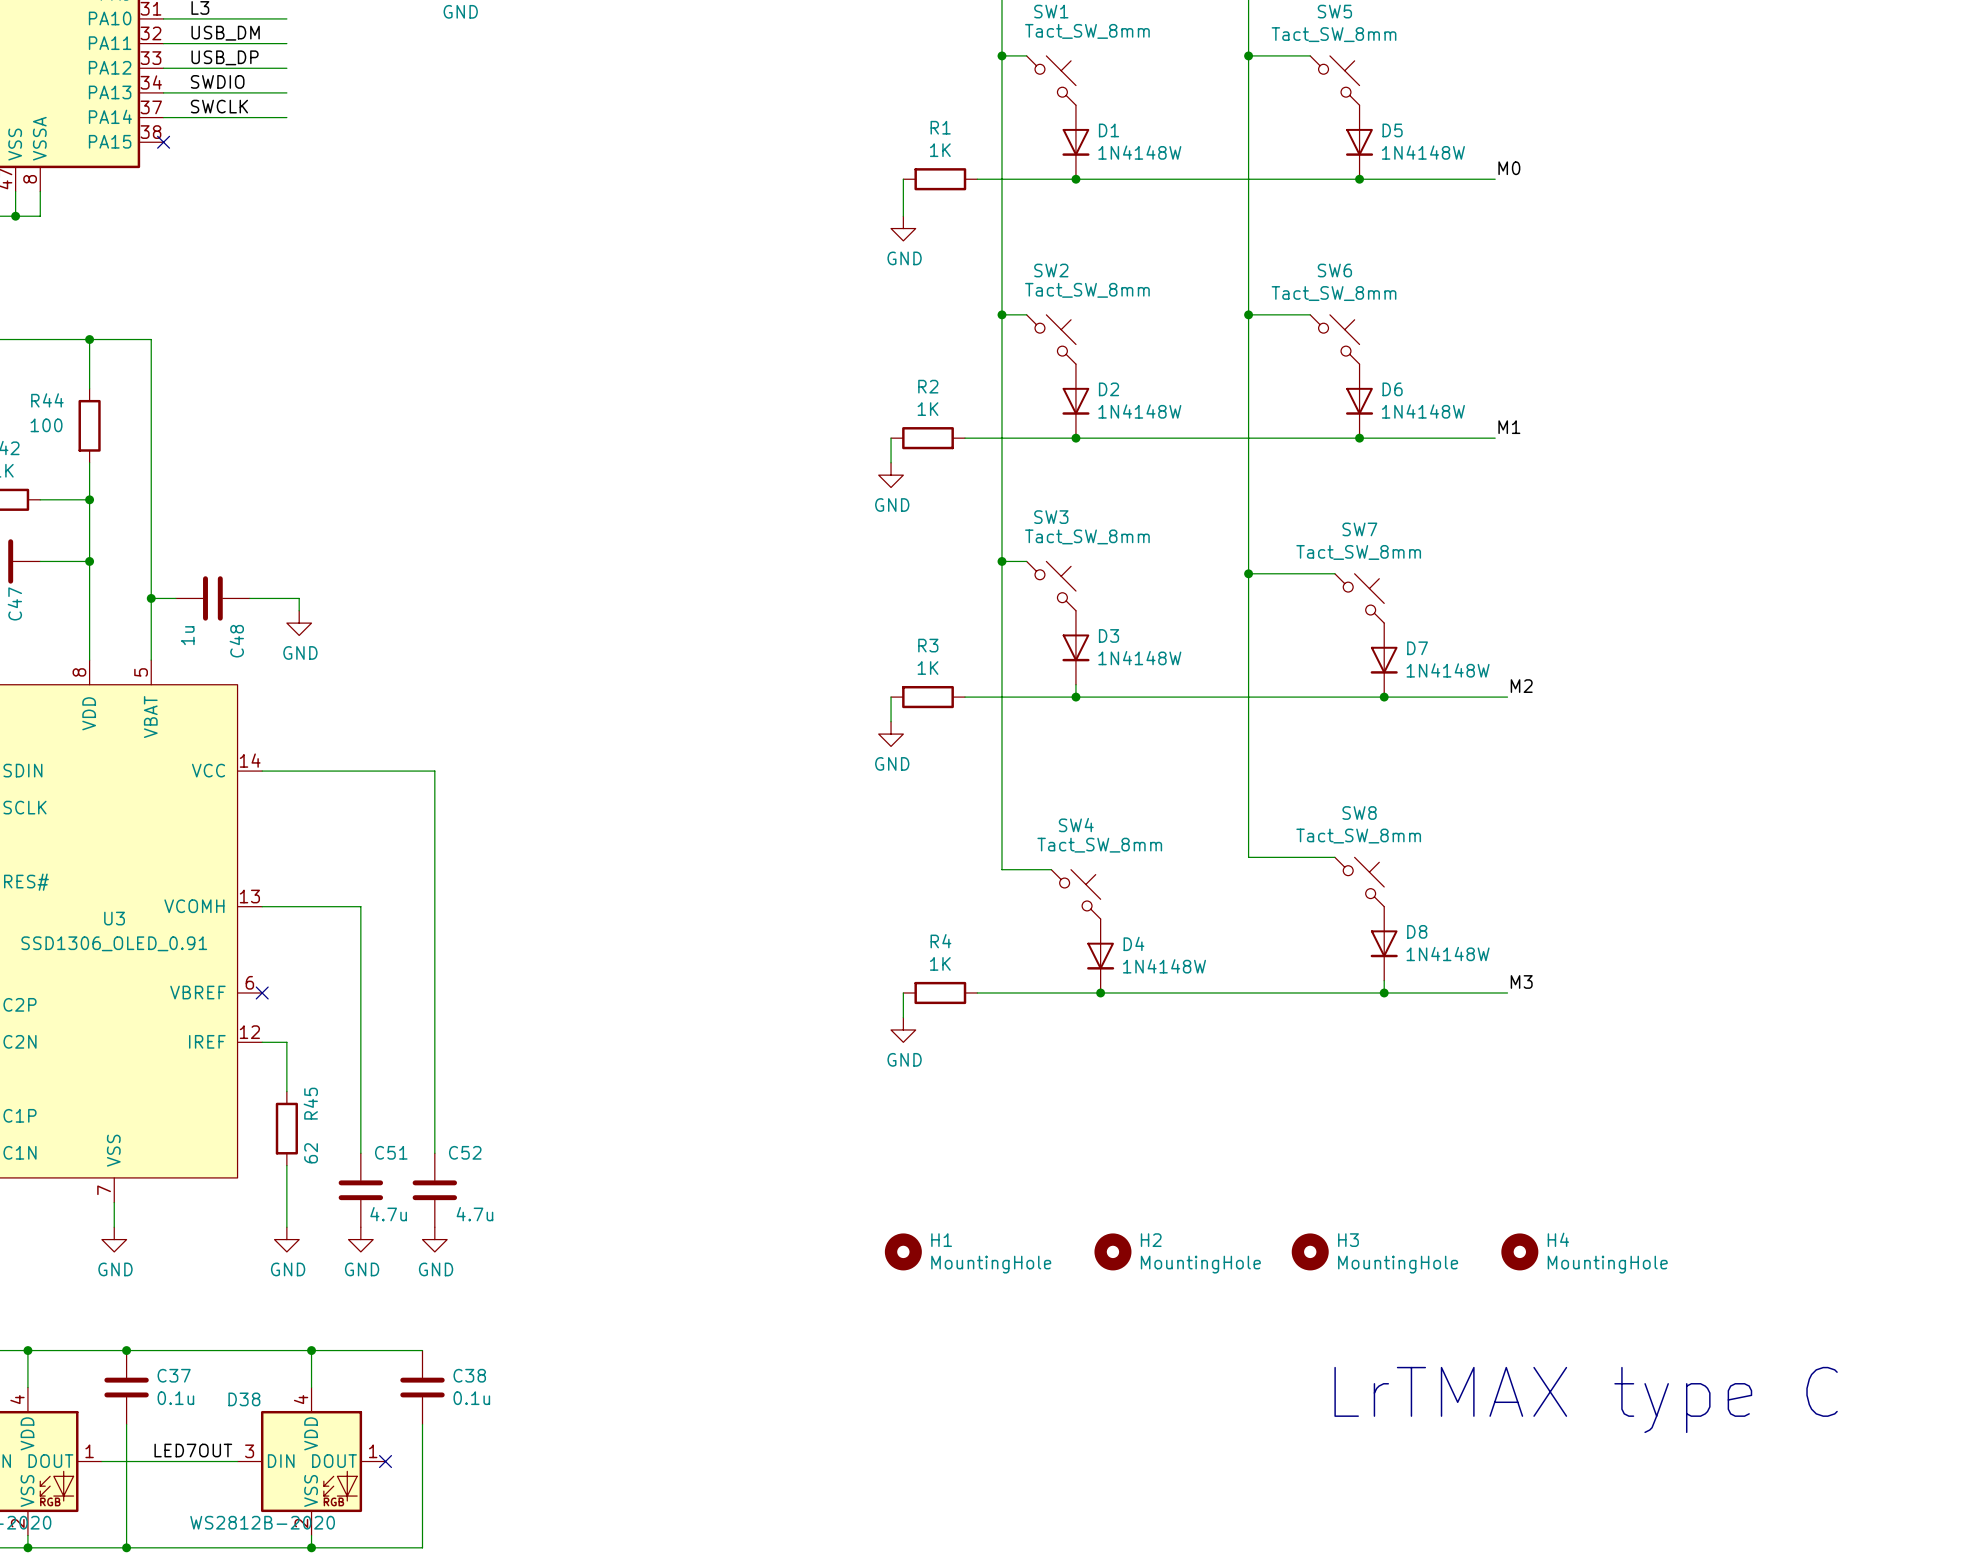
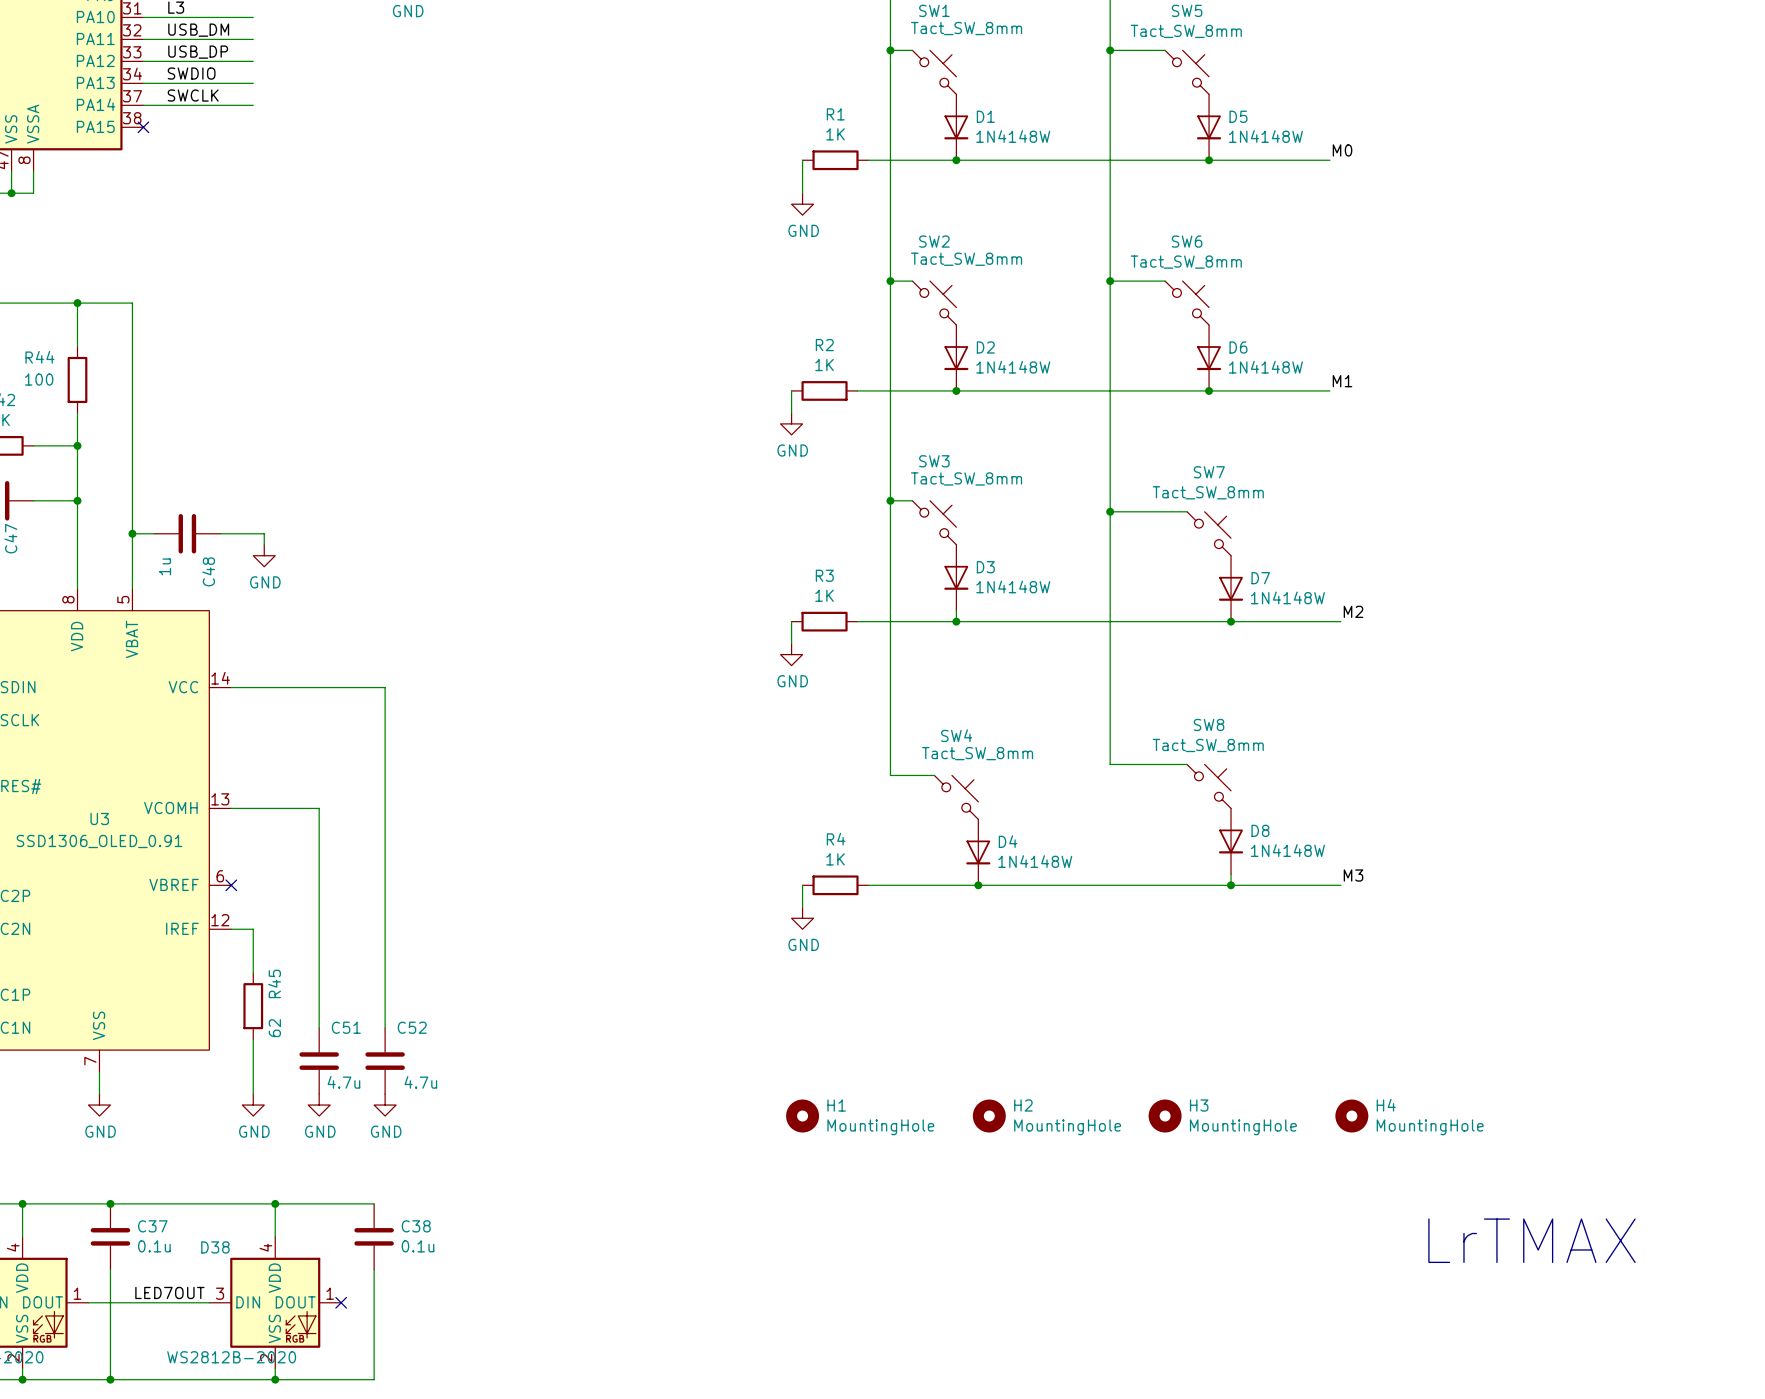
text: none -> LrTMAX (1532, 1240)
text: LrTMAX type C (1586, 1399) -> none

